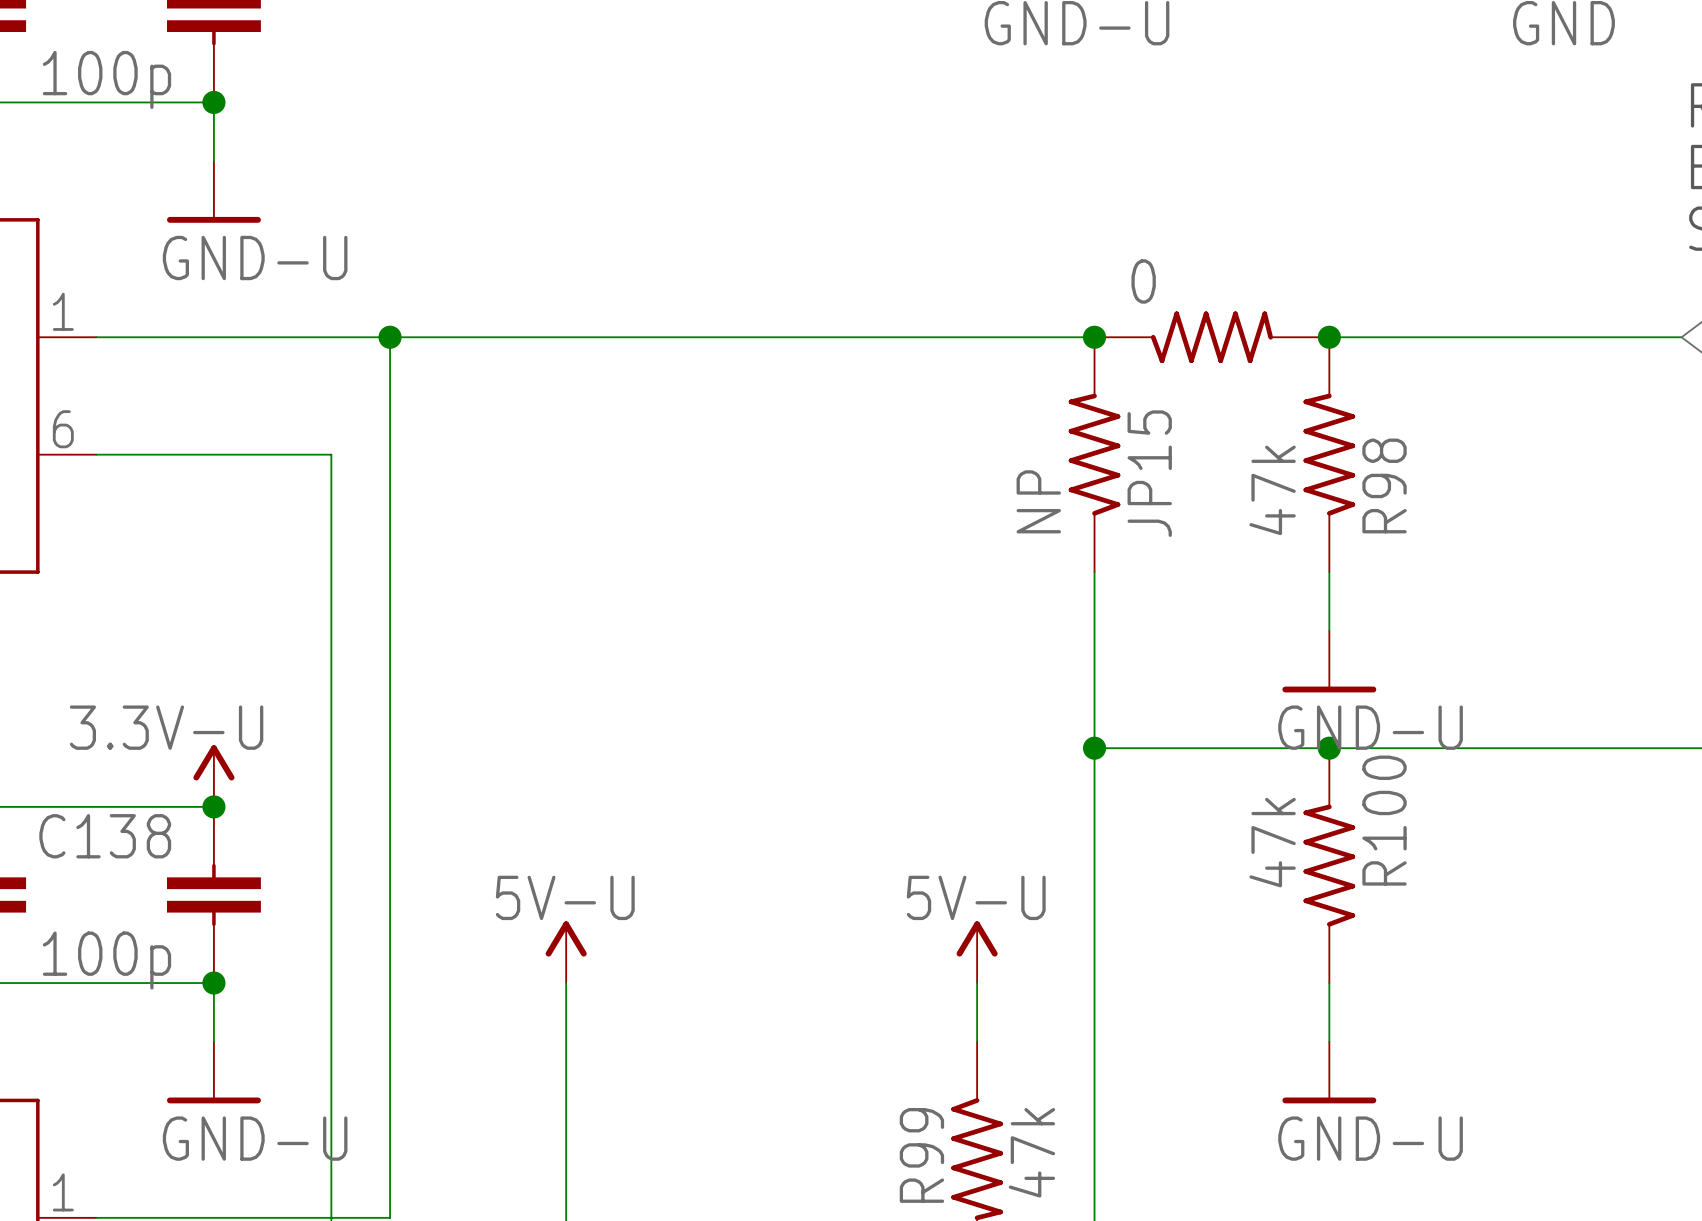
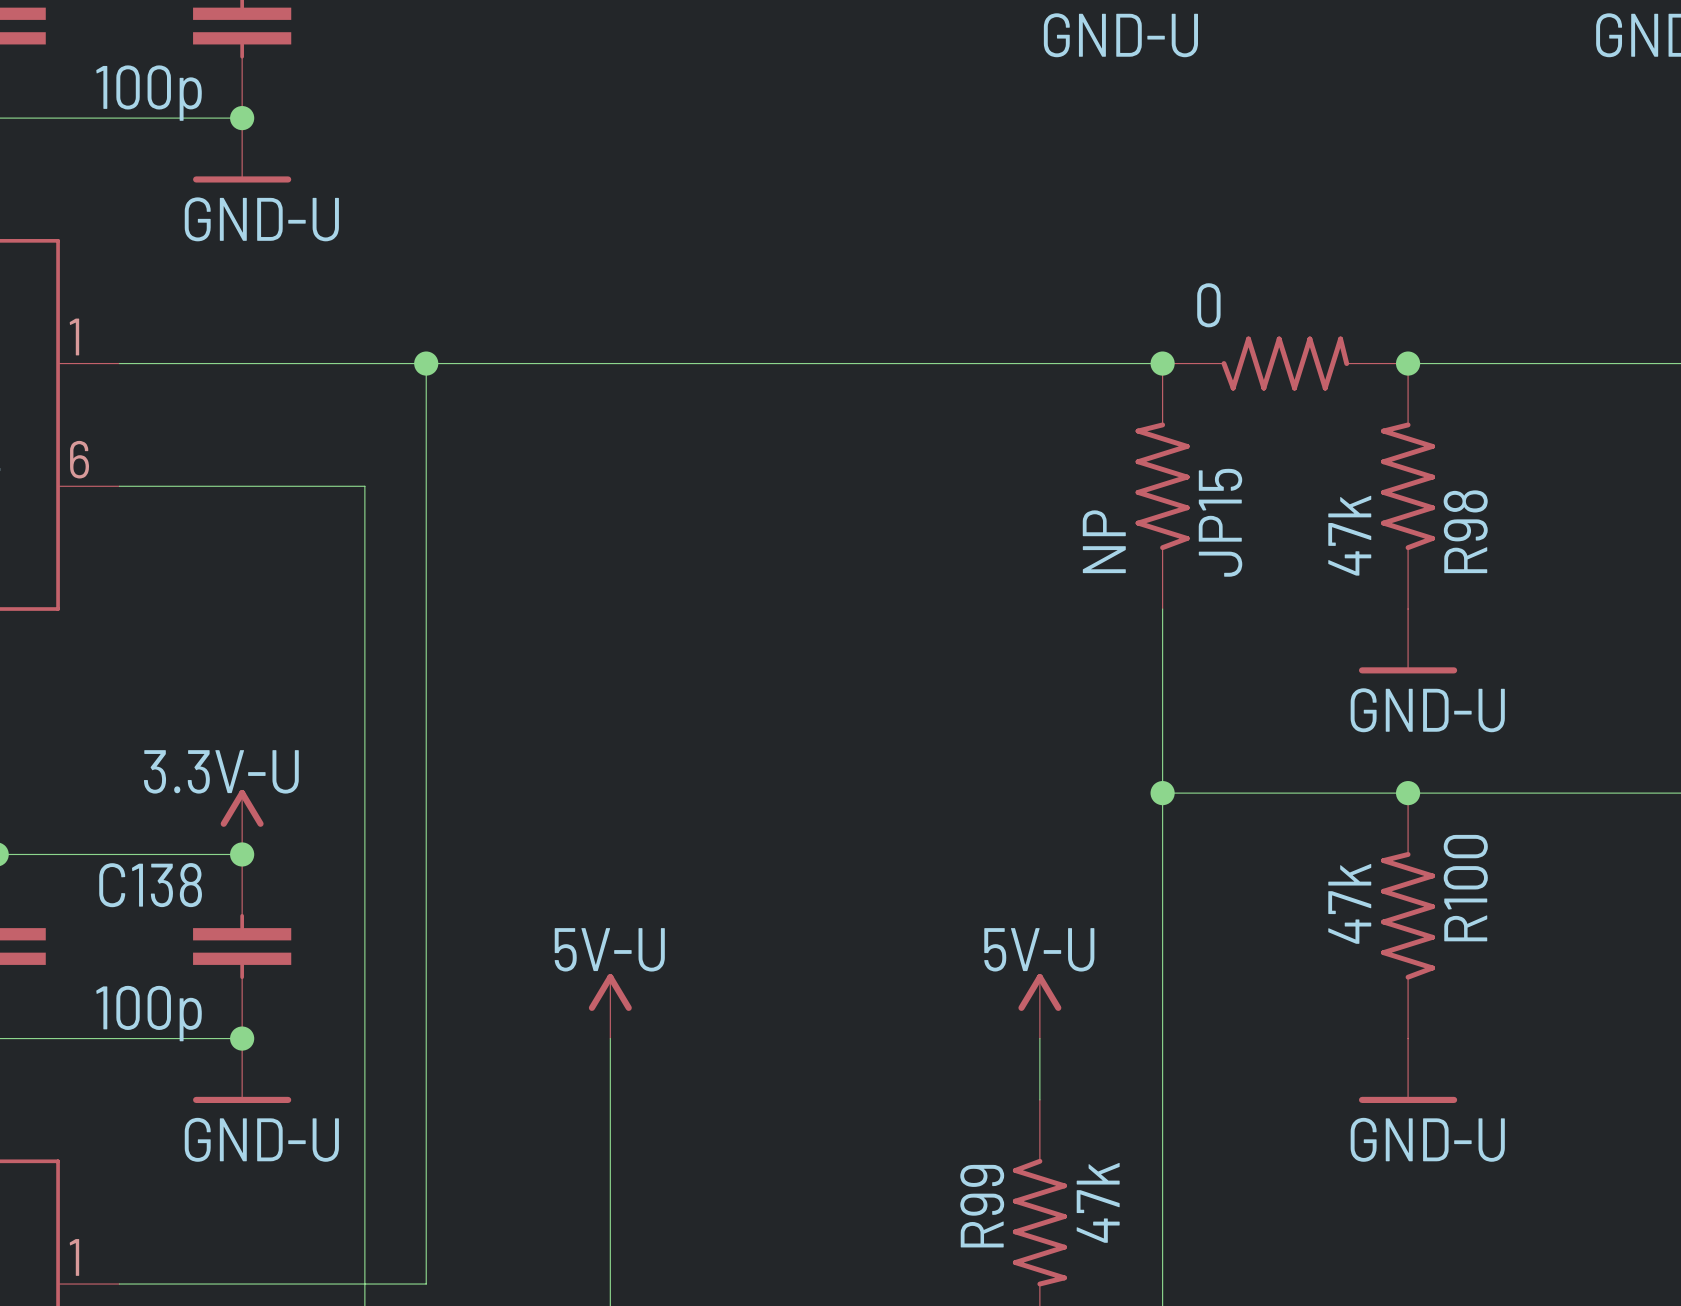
power symbol position: GND-U (213, 191) -> GND-U (242, 150)
power symbol position: GND-U (1329, 661) -> GND-U (1408, 641)
power symbol position: GND-U (213, 1072) -> GND-U (242, 1070)
power symbol position: GND-U (1329, 1072) -> GND-U (1408, 1070)

